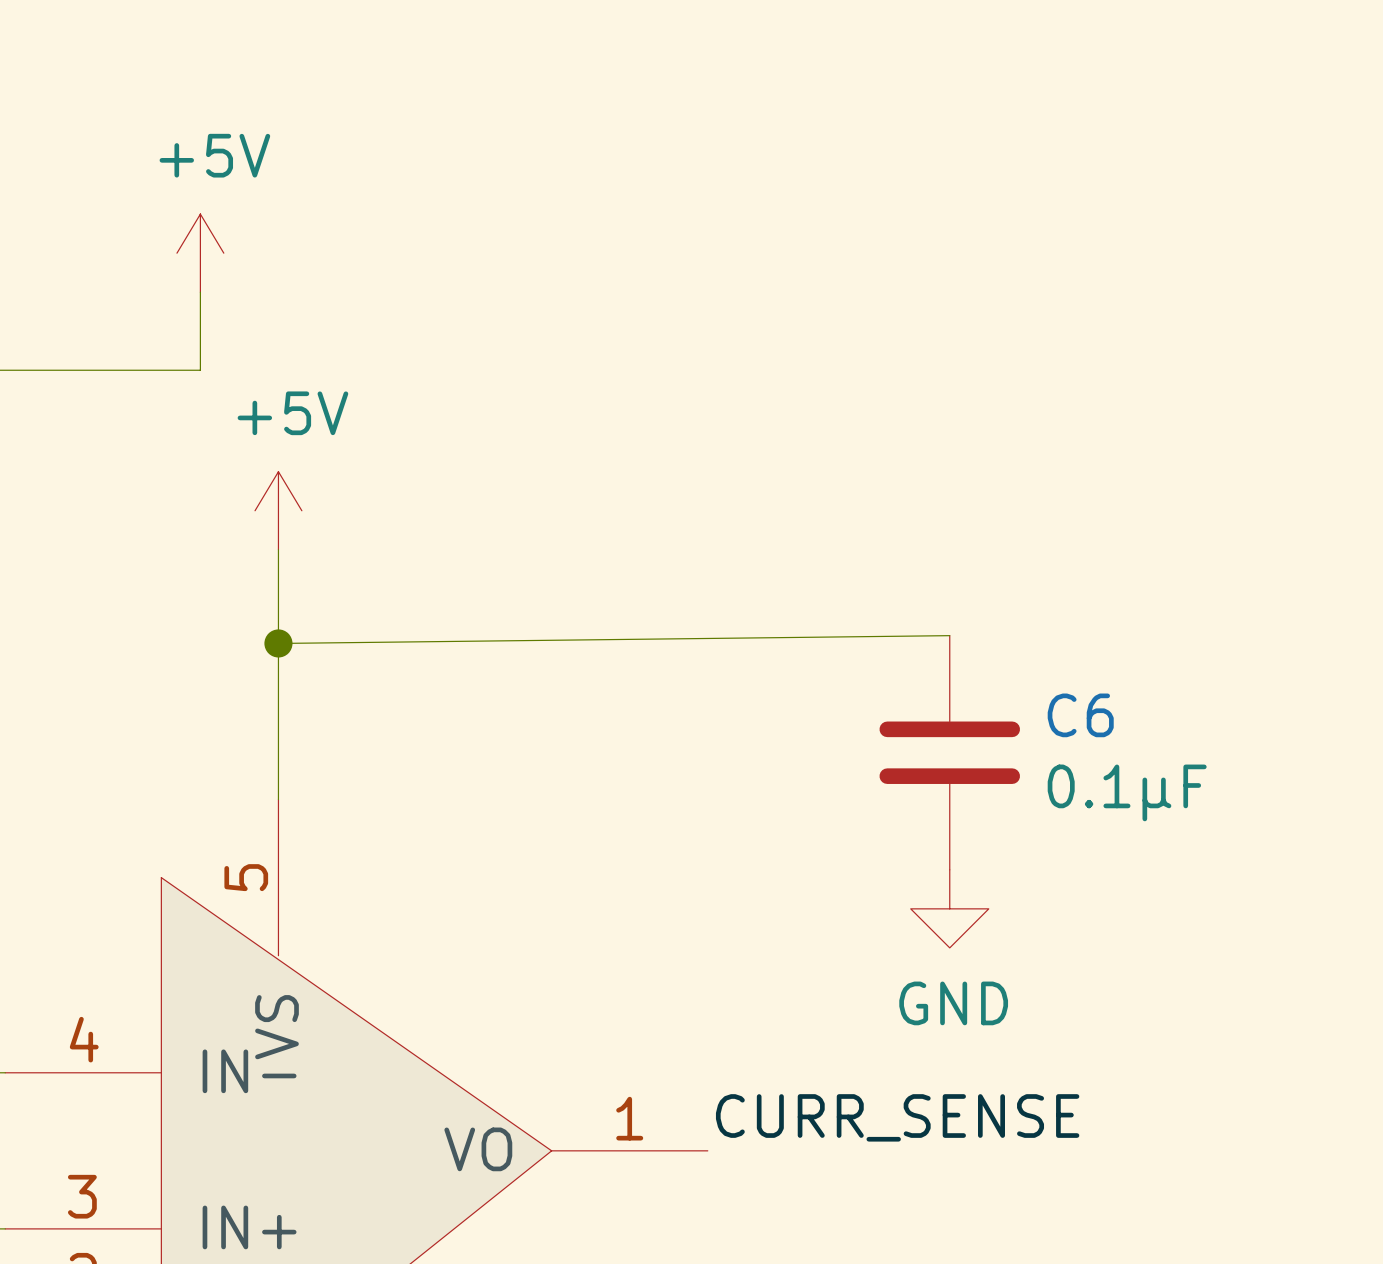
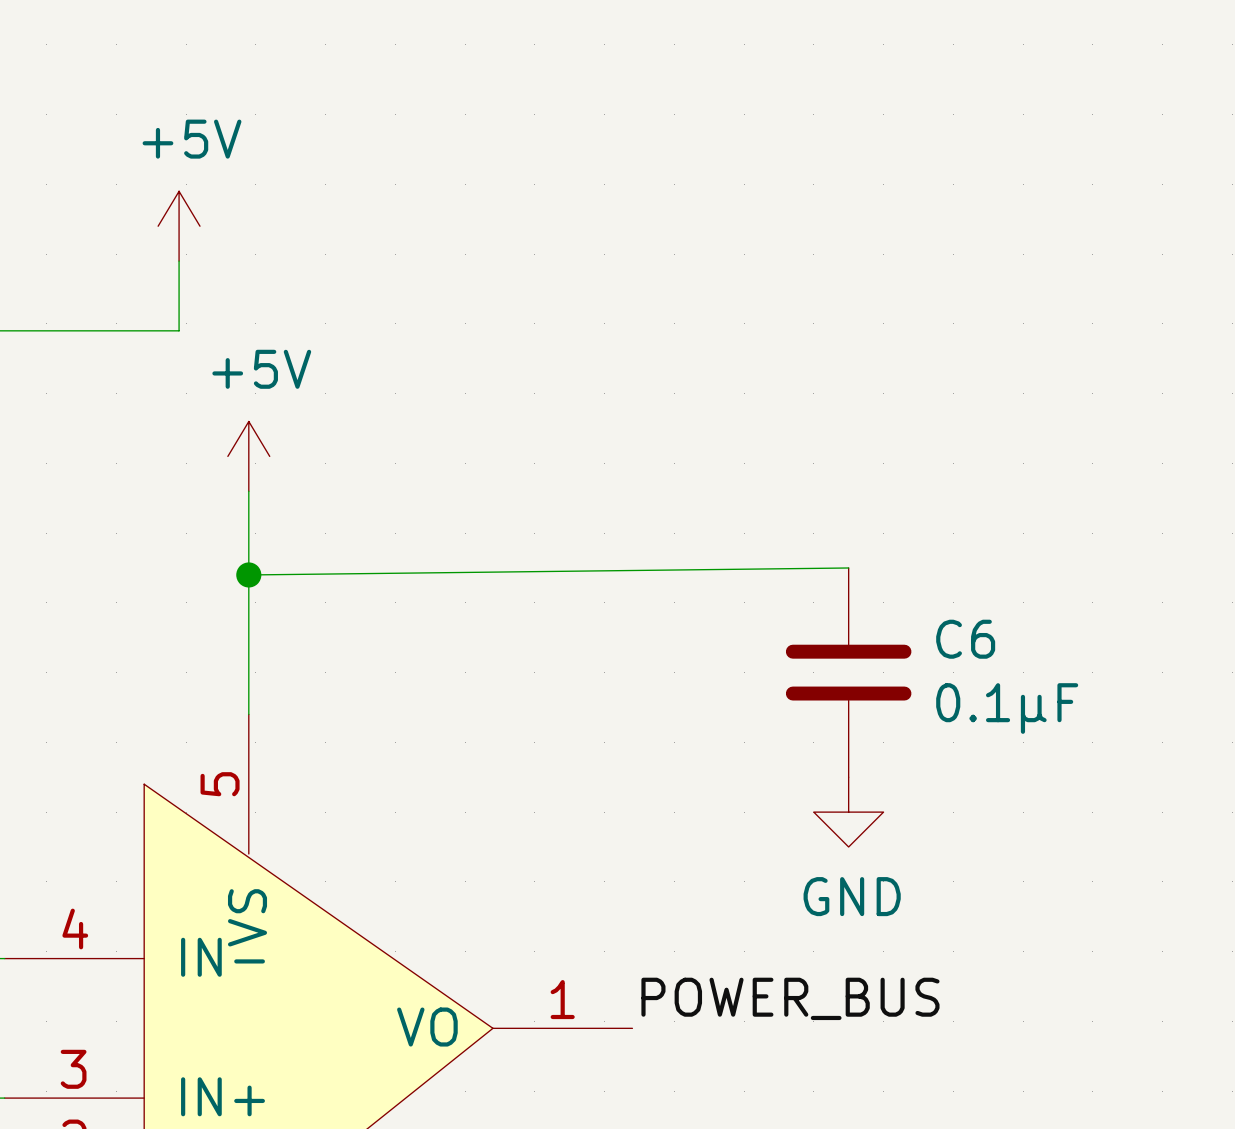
label: CURR_SENSE (897, 1117) -> POWER_BUS (790, 998)

